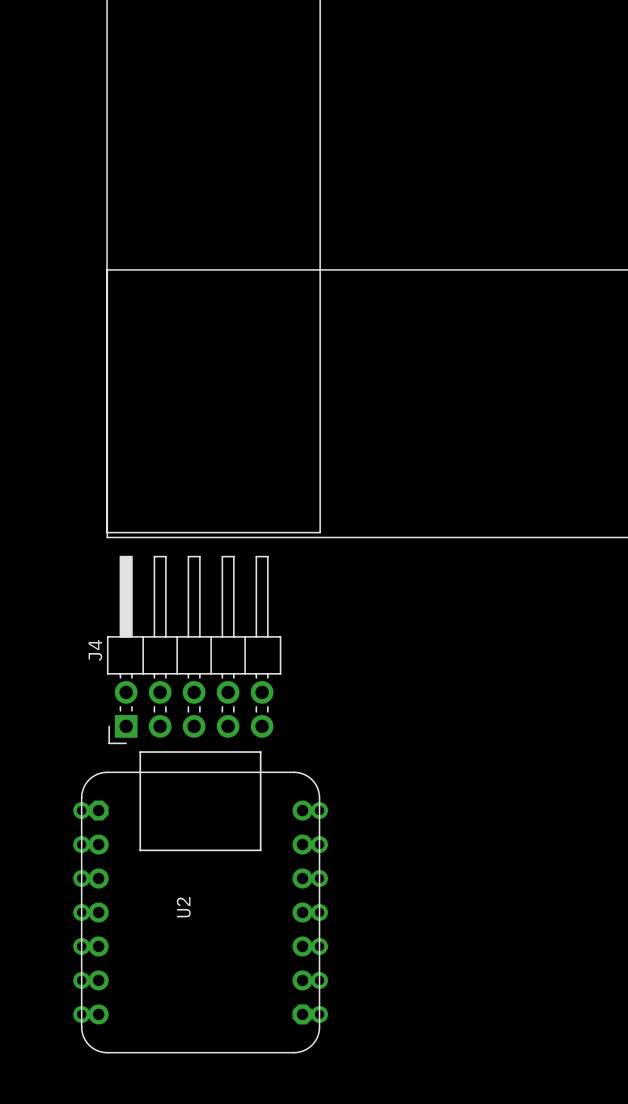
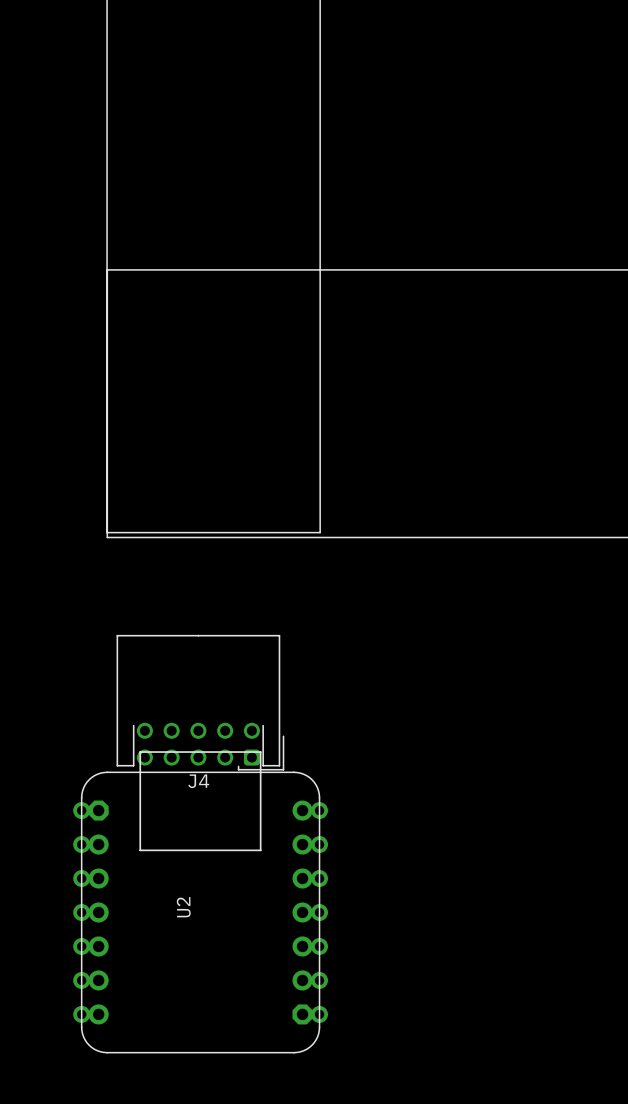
J4 footprint: [106, 555, 282, 745] -> [116, 634, 285, 771]
J4 name position: J4 (95, 650) -> J4 (198, 781)

